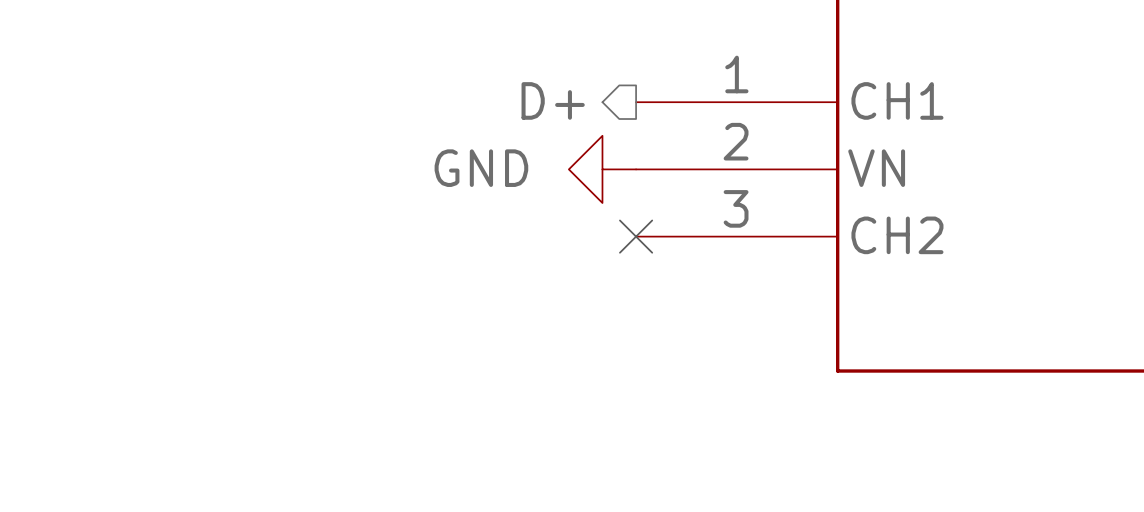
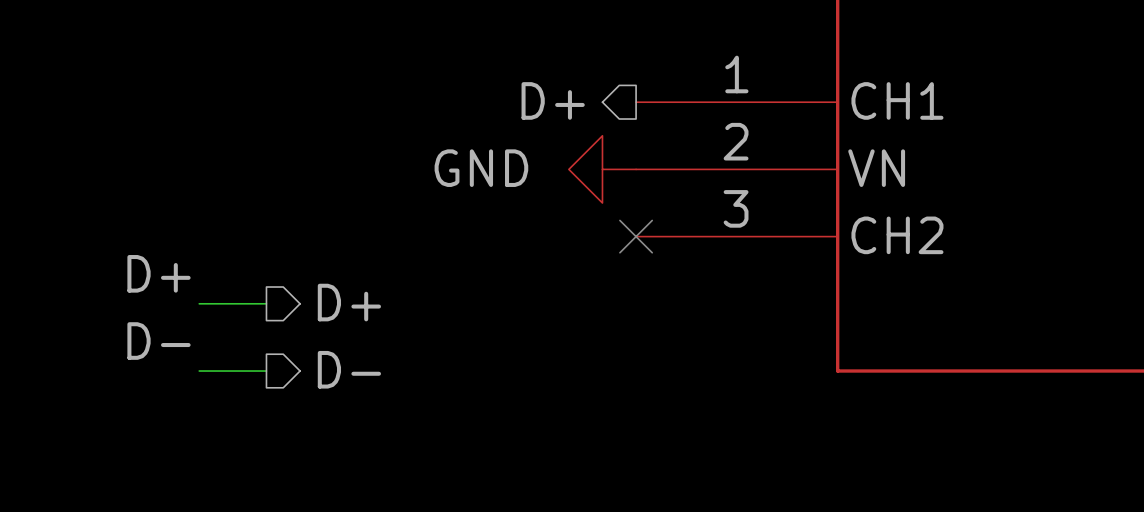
label: none -> D+ (159, 273)
hierarchical label: none -> D+ (349, 302)
wire: none -> (199, 303) (266, 303)
label: none -> D- (159, 341)
hierarchical label: none -> D- (349, 369)
wire: none -> (199, 371) (266, 371)

